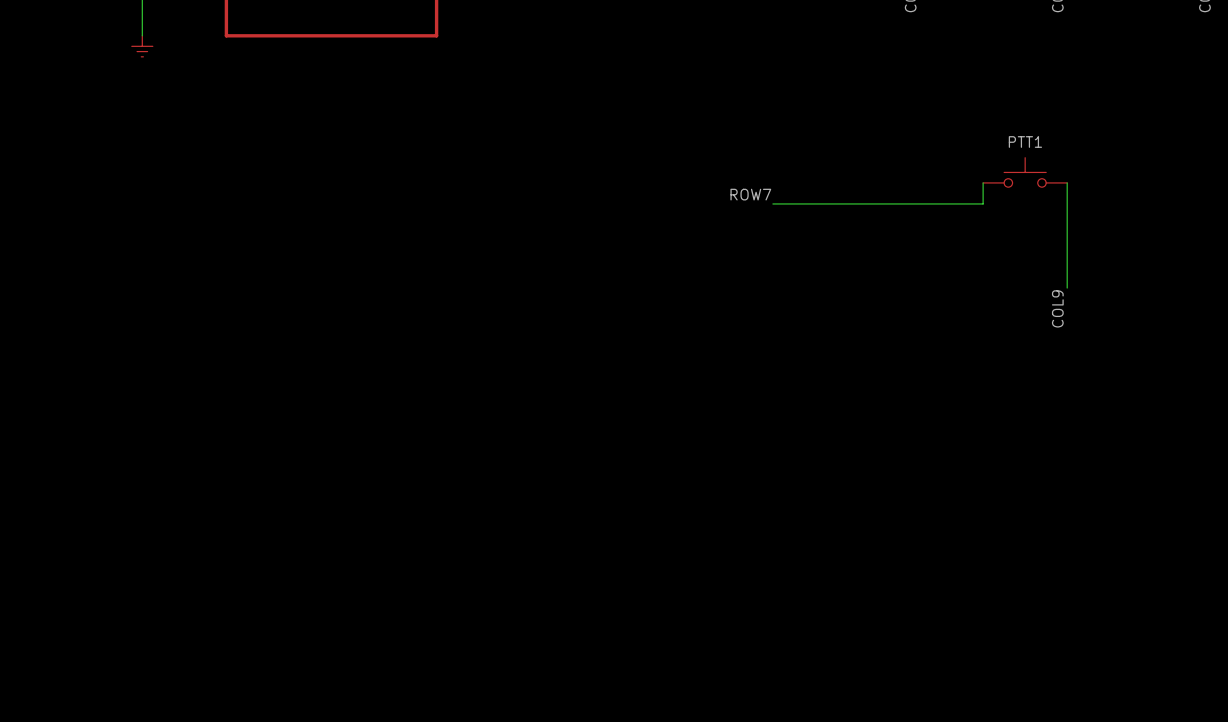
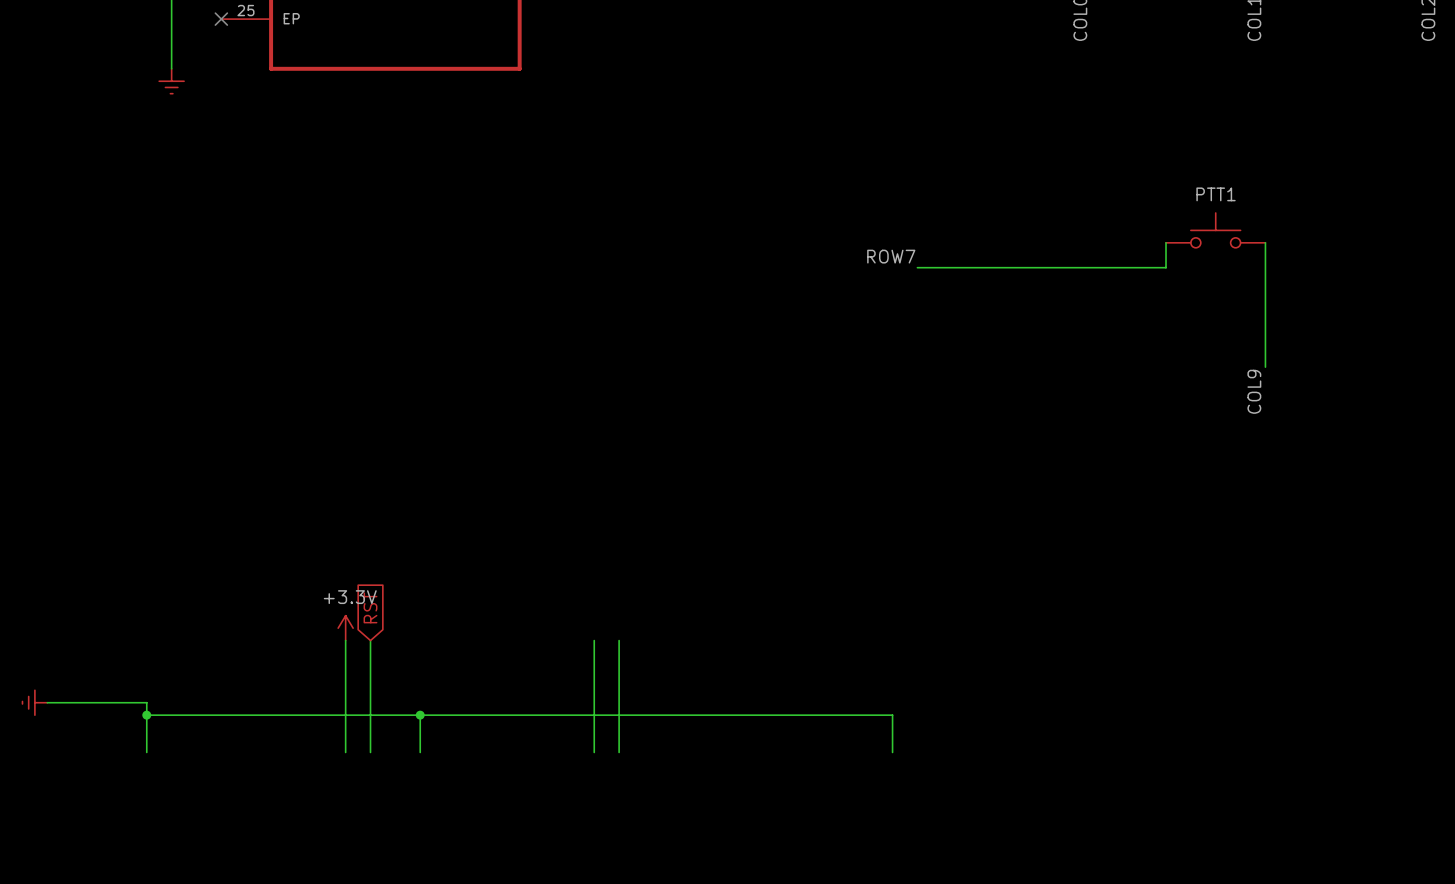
global label: none -> RST (370, 607)
power symbol: none -> +3.3V (345, 628)
wire: none -> (345, 640) (345, 752)
wire: none -> (370, 640) (370, 752)
wire: none -> (594, 640) (594, 752)
wire: none -> (619, 640) (619, 752)
power symbol: none -> (34, 702)
wire: none -> (47, 702) (146, 702) (146, 752)
wire: none -> (146, 715) (892, 715) (892, 752)
junction: none -> (146, 715)
wire: none -> (420, 715) (420, 752)
junction: none -> (420, 715)

